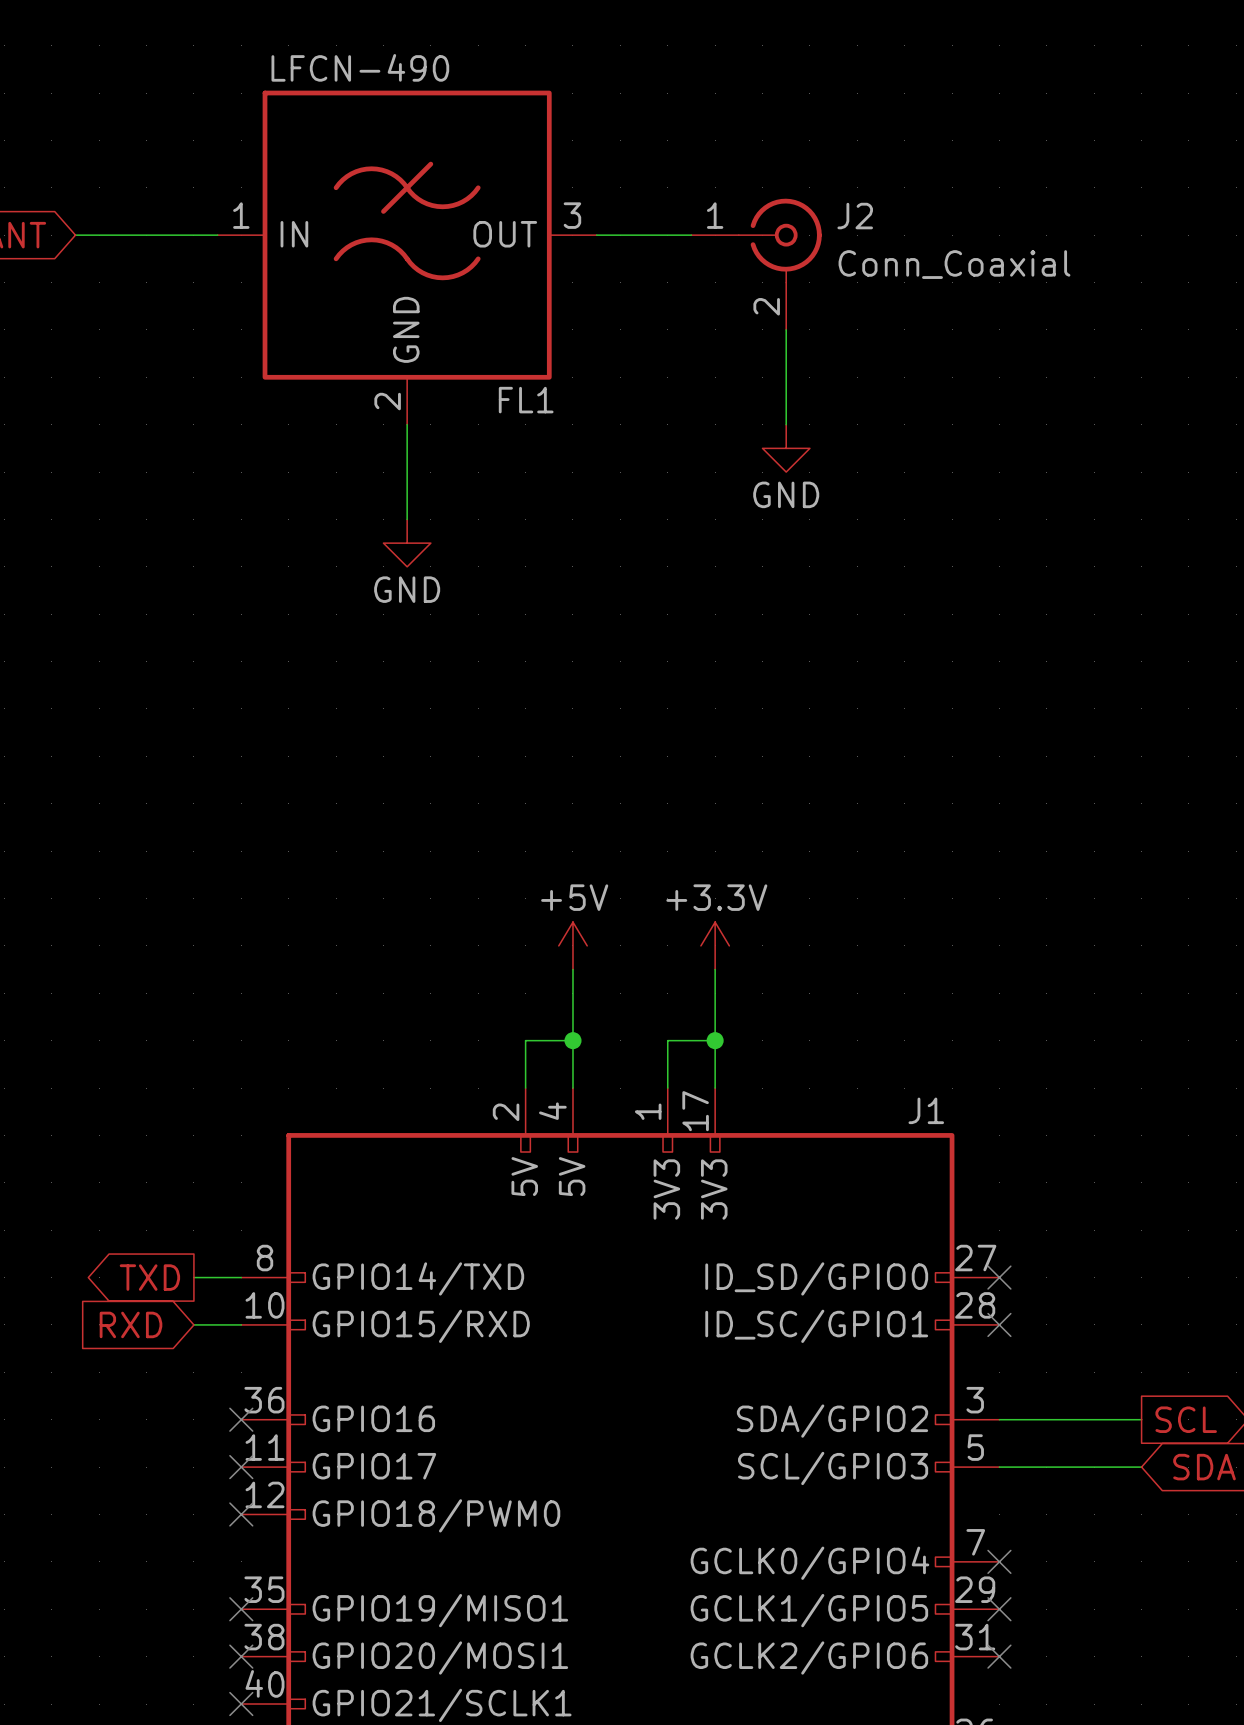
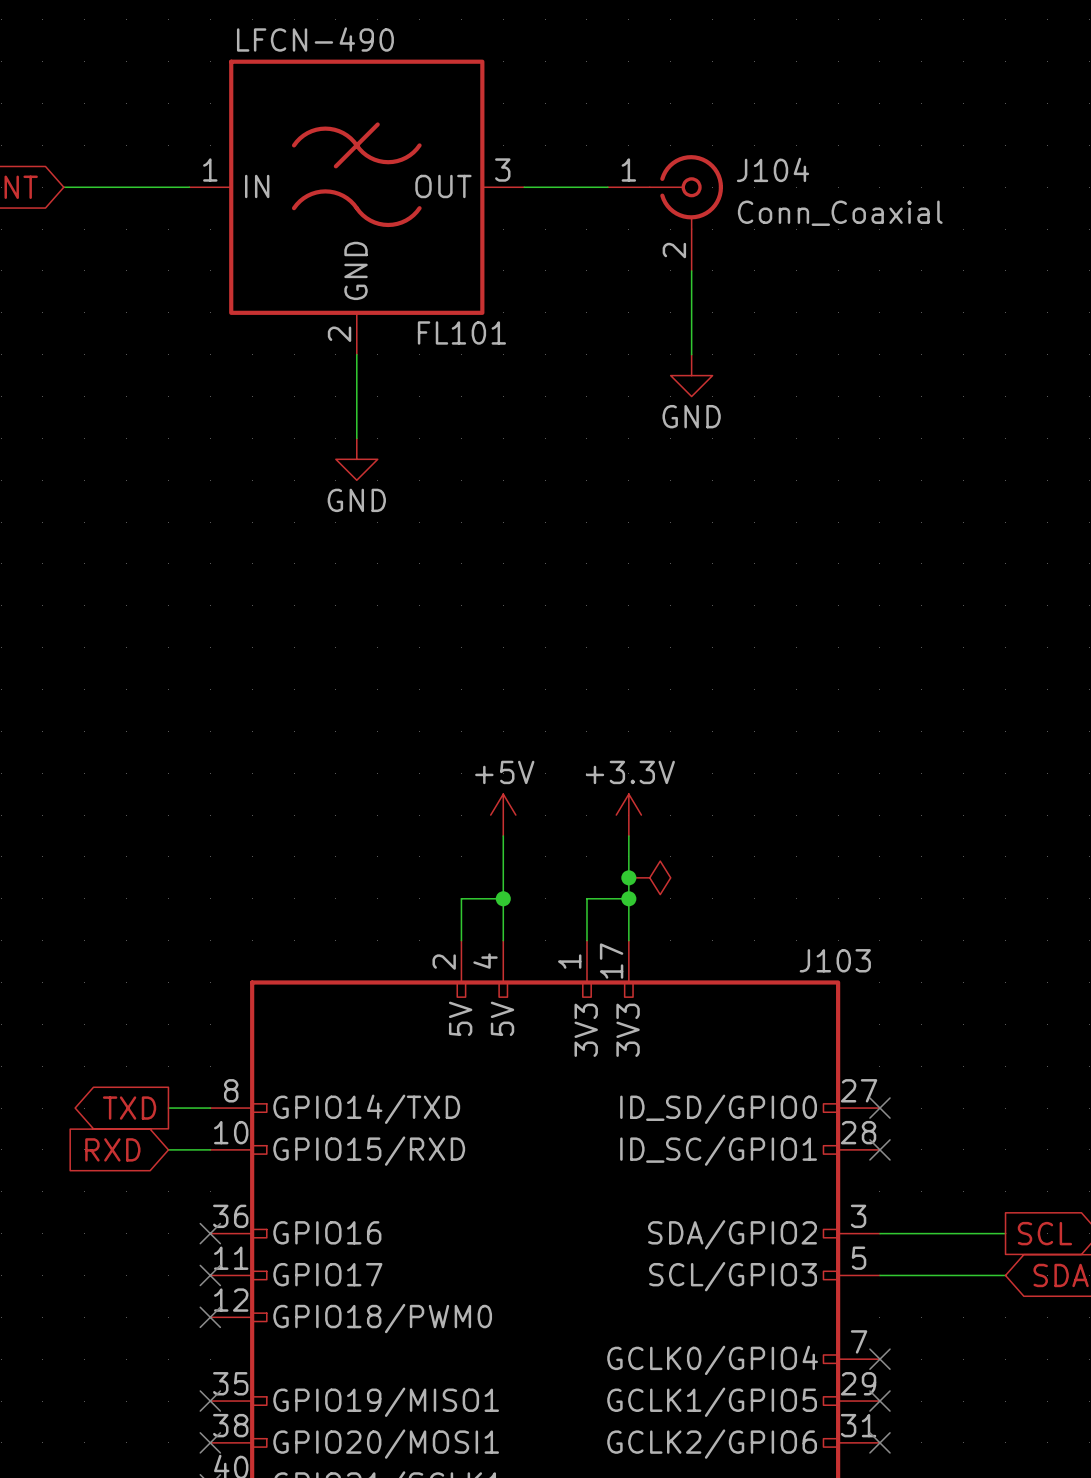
J2 name: J2 (855, 216) -> J104 (773, 169)
FL1 name: FL1 (526, 400) -> FL101 (461, 332)
junction: none -> (628, 877)
power symbol: none -> (649, 877)
J1 name: J1 (926, 1110) -> J103 (835, 960)

